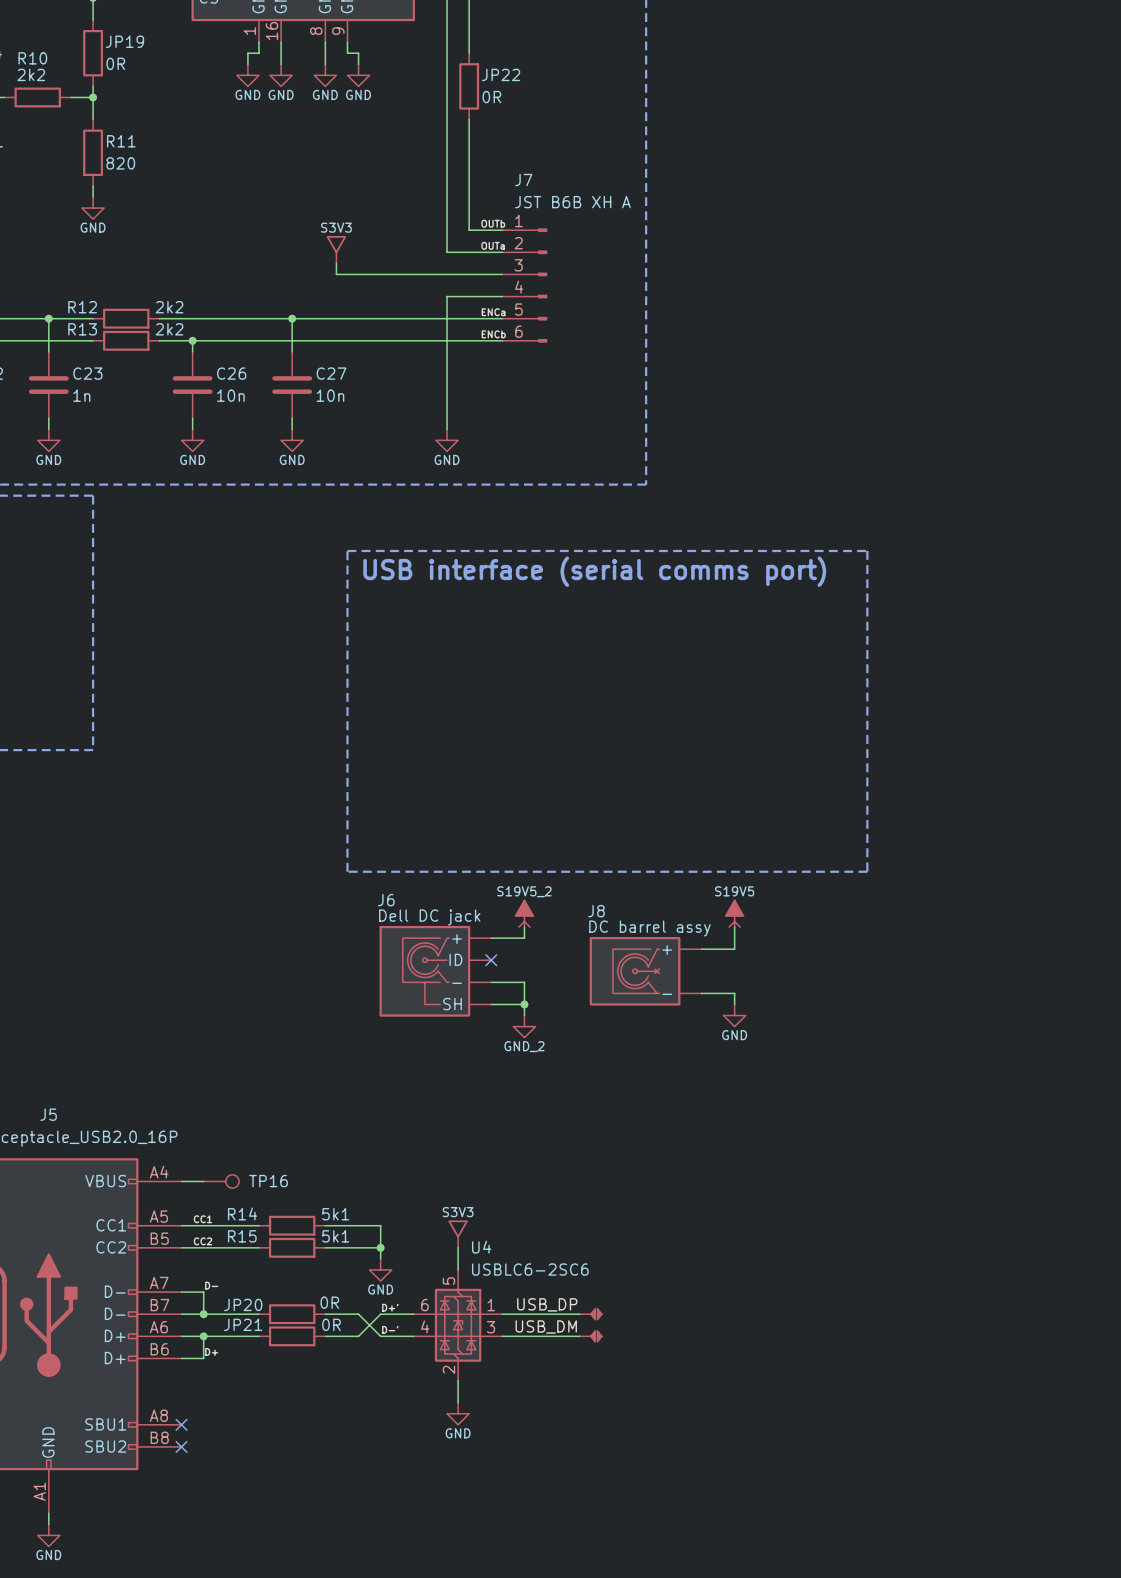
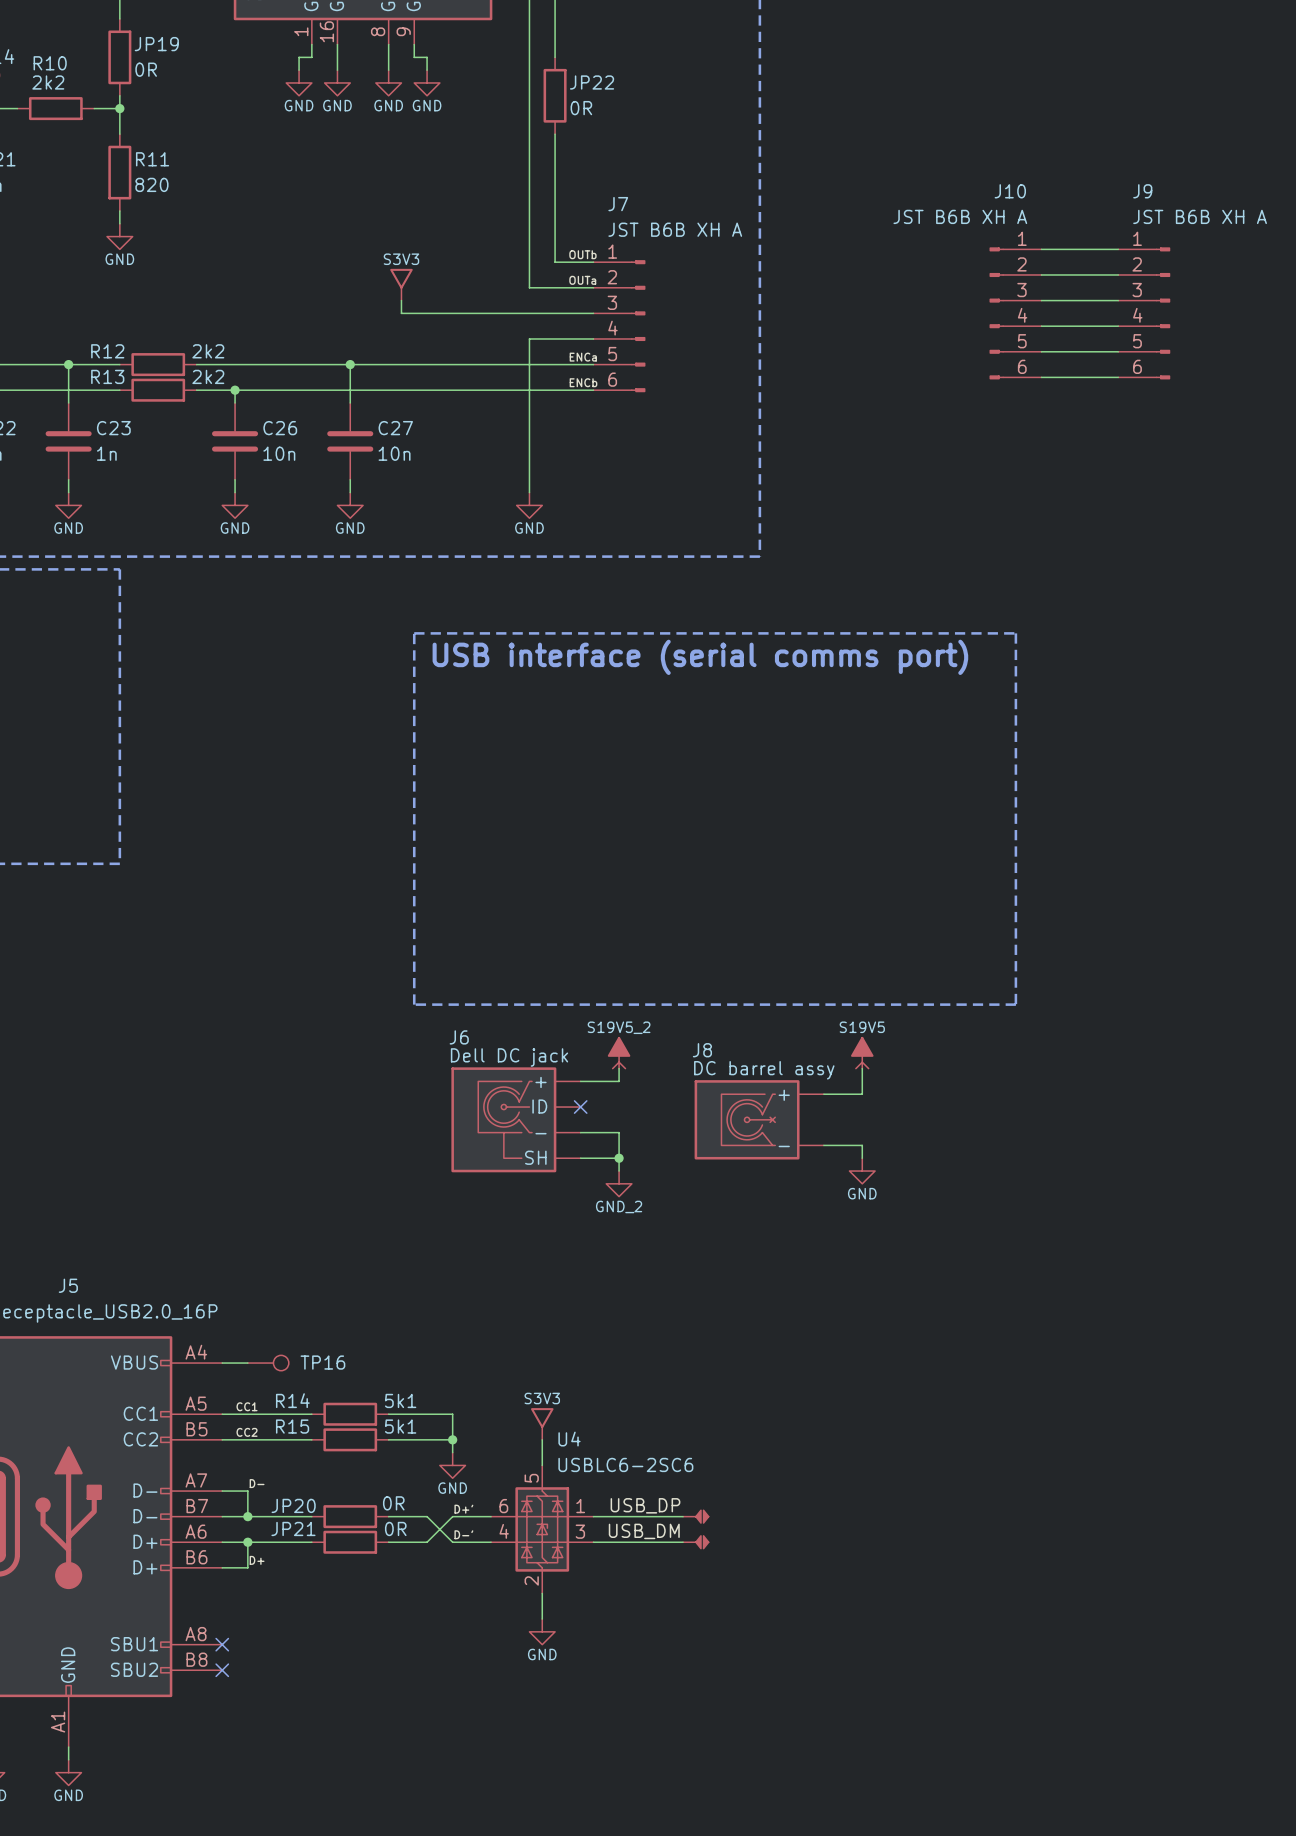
wire: none -> (1041, 249) (1118, 249)
wire: none -> (1041, 274) (1118, 274)
wire: none -> (1041, 300) (1118, 300)
J10: none -> JST B6B XH A (1015, 313)
J9: none -> JST B6B XH A (1144, 313)
wire: none -> (1041, 326) (1118, 326)
wire: none -> (1041, 351) (1118, 351)
wire: none -> (1041, 377) (1118, 377)

